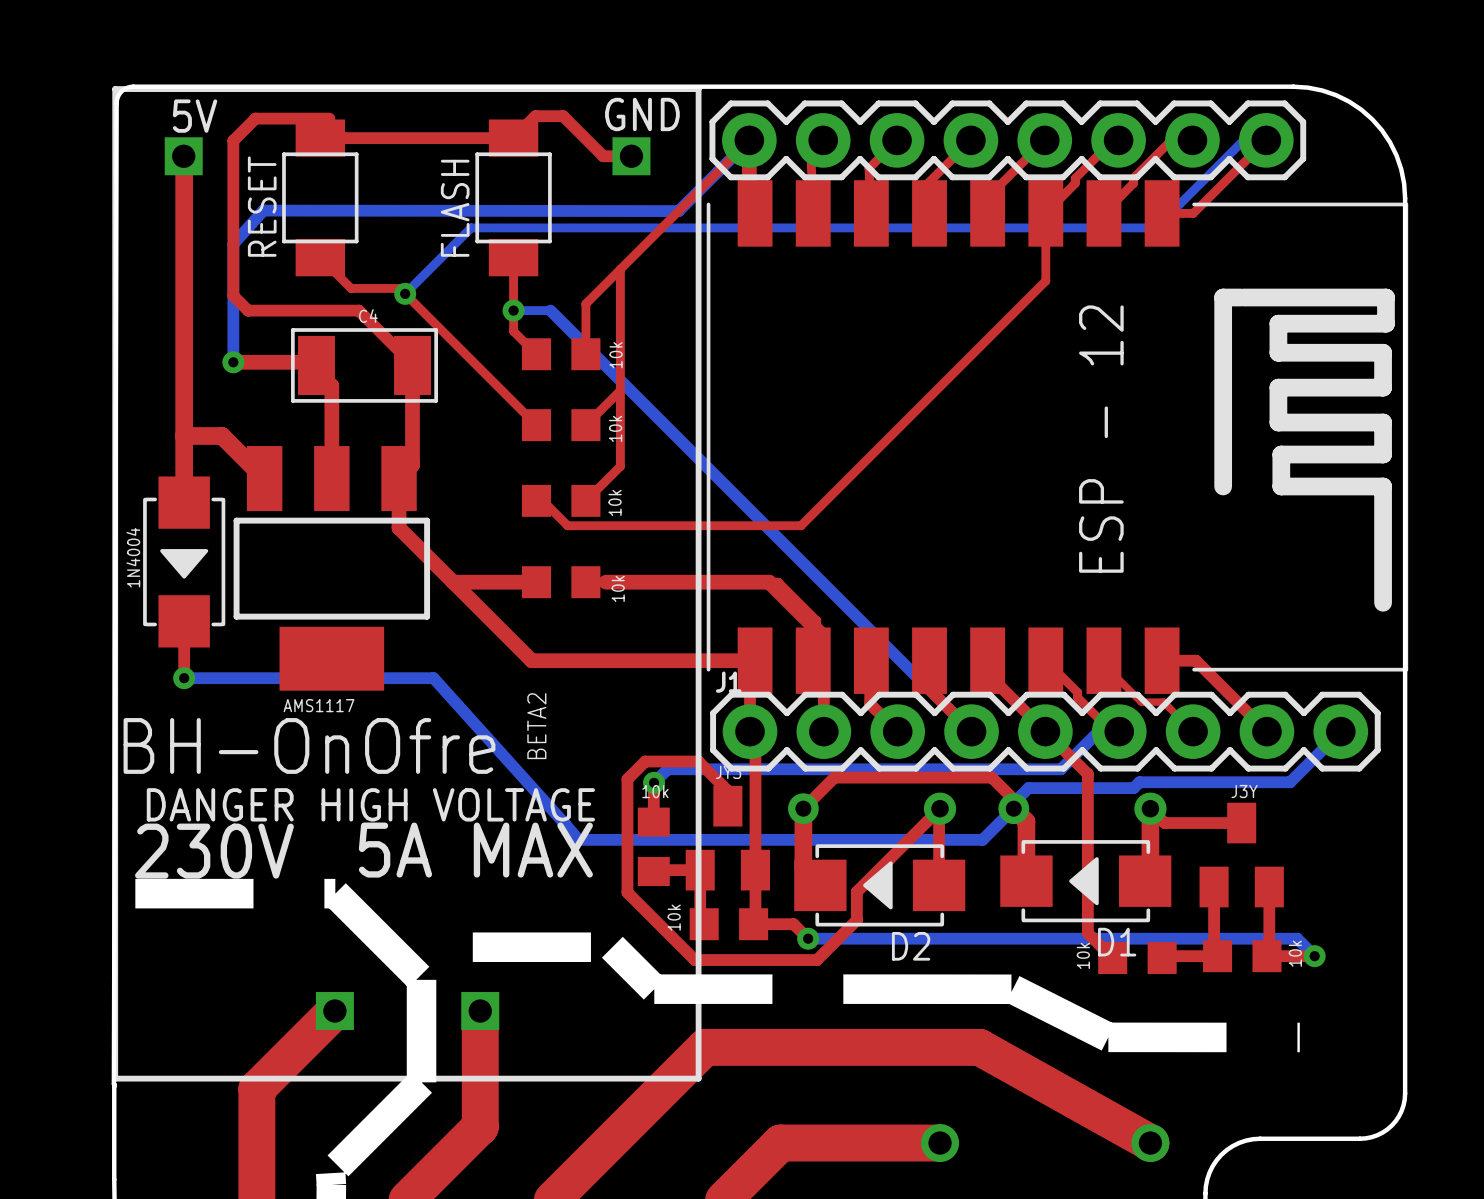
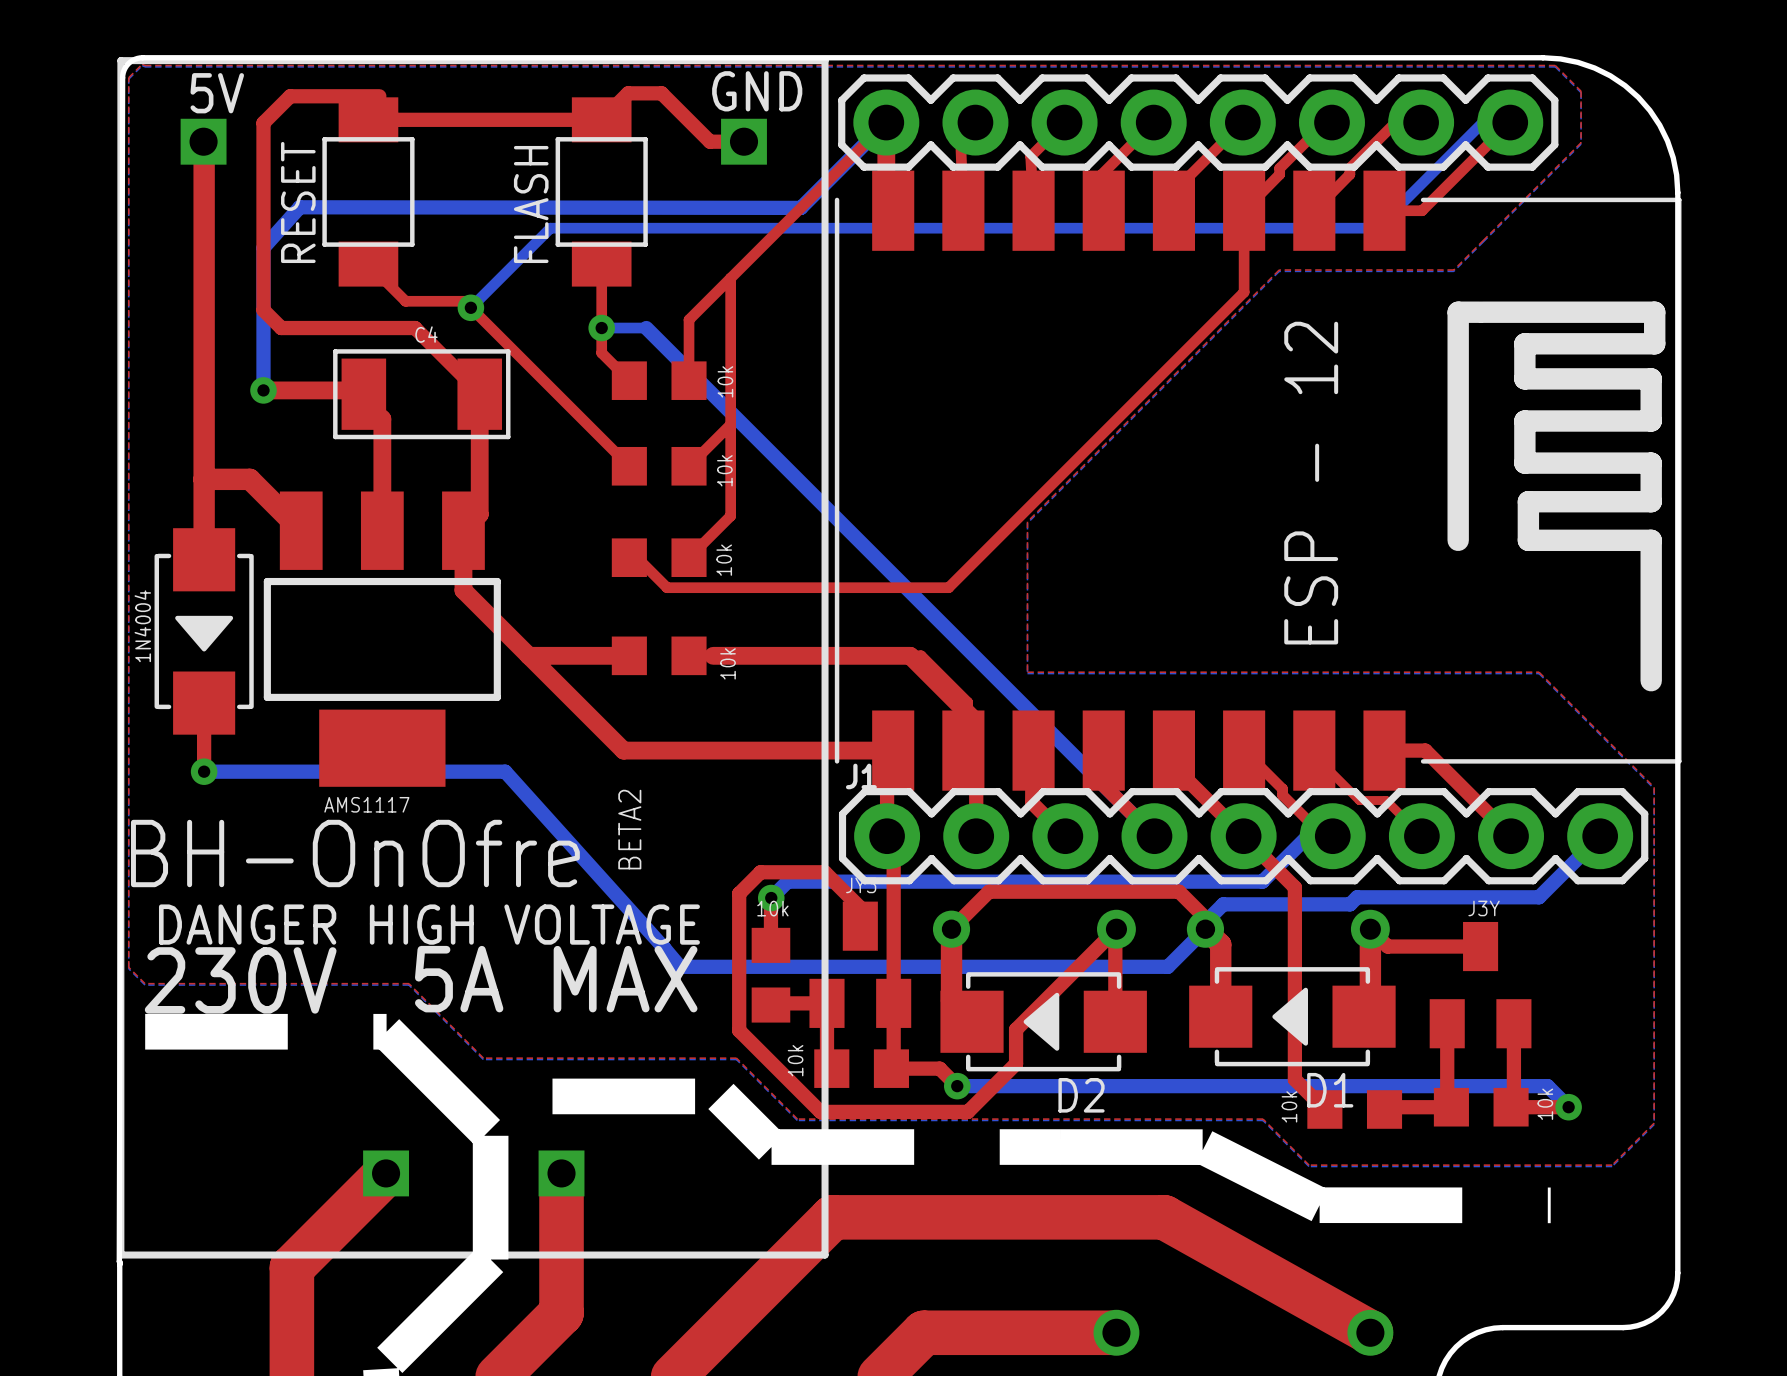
top zone outline: none -> (142, 64) (128, 77) (128, 967) (145, 983) (408, 983) (483, 1058) (736, 1058) (797, 1119) (1262, 1119) (1309, 1165) (1612, 1165) (1654, 1123) (1654, 787) (1539, 672) (1027, 672) (1027, 521) (1279, 270) (1453, 270) (1581, 142) (1581, 91) (1555, 65) (142, 64)
bottom zone outline: none -> (142, 65) (128, 79) (128, 968) (145, 985) (408, 985) (483, 1059) (736, 1059) (797, 1120) (1262, 1120) (1309, 1166) (1612, 1166) (1654, 1124) (1654, 788) (1539, 673) (1027, 673) (1027, 523) (1279, 271) (1453, 271) (1581, 144) (1581, 92) (1555, 66) (142, 65)

